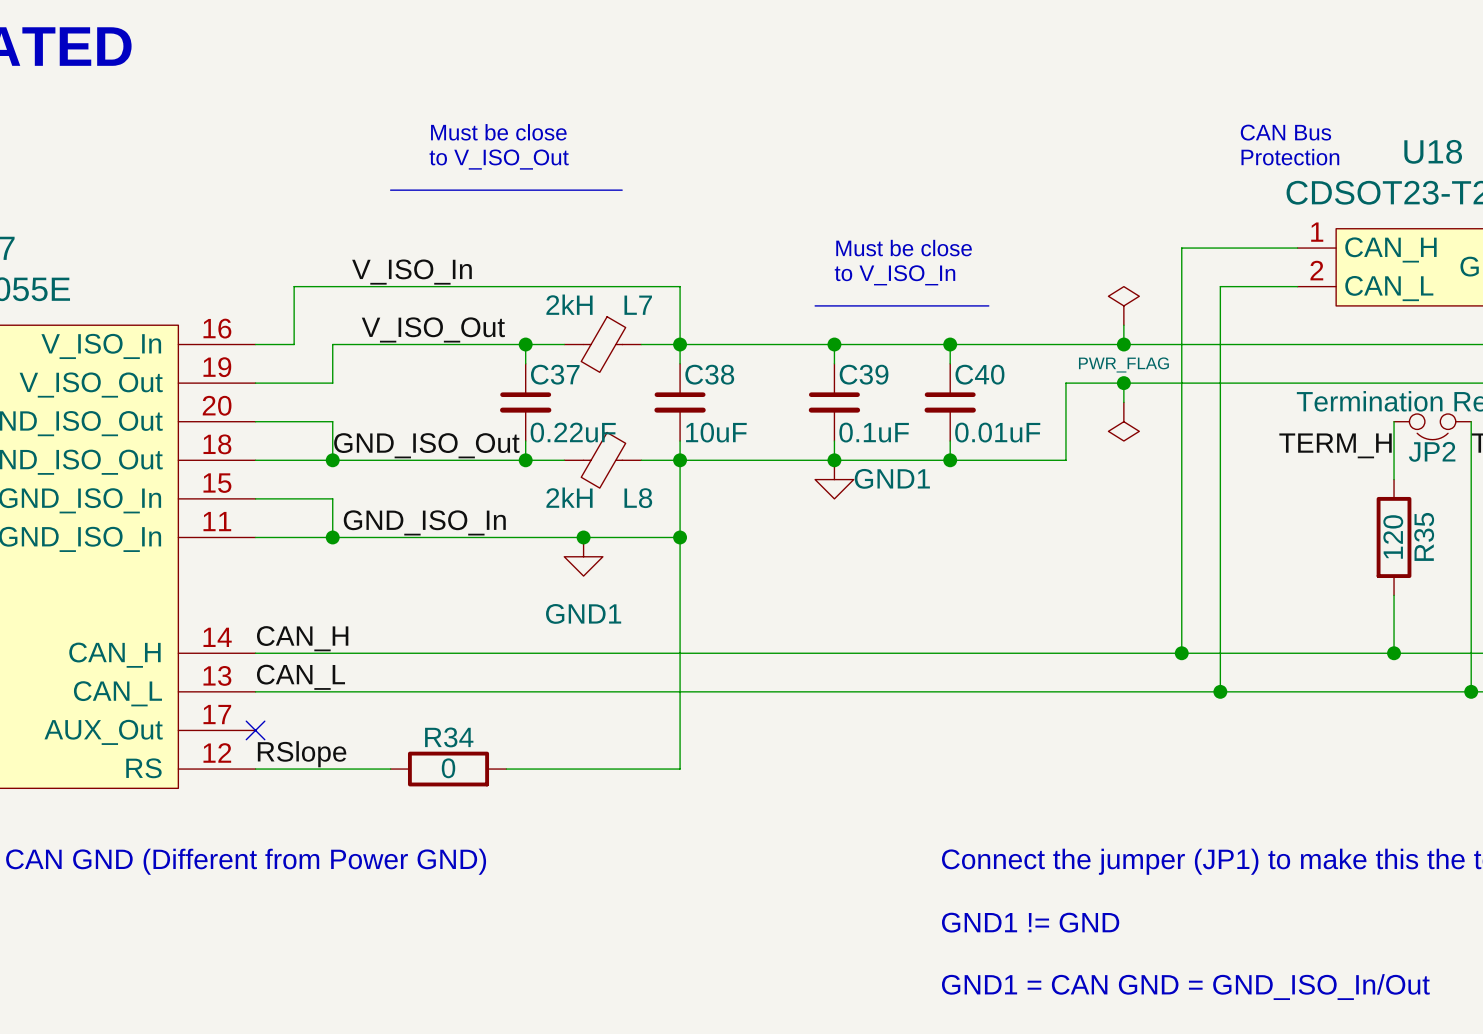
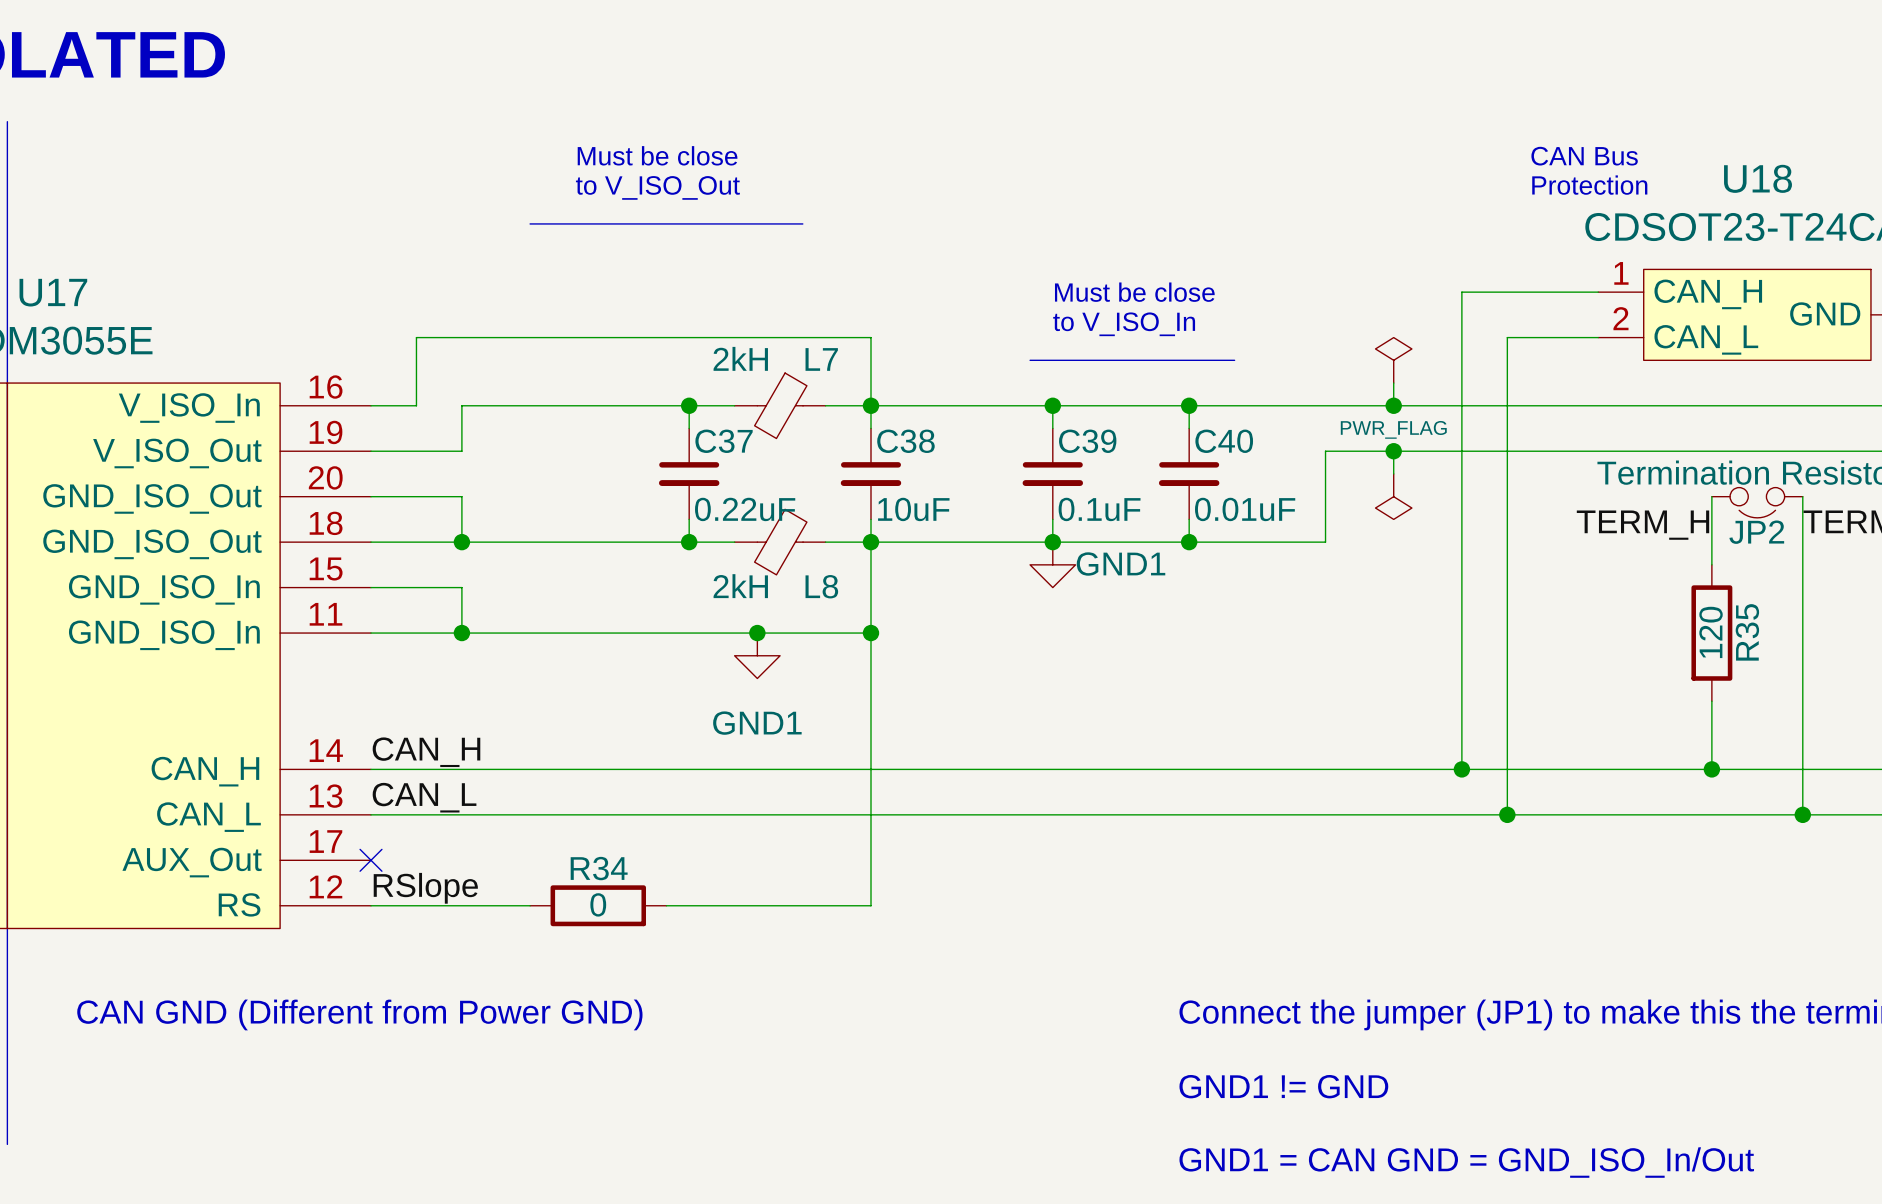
label: V_ISO_In (411, 272) -> none
label: V_ISO_Out (433, 329) -> none
label: GND_ISO_Out (426, 445) -> none
label: GND_ISO_In (424, 522) -> none

